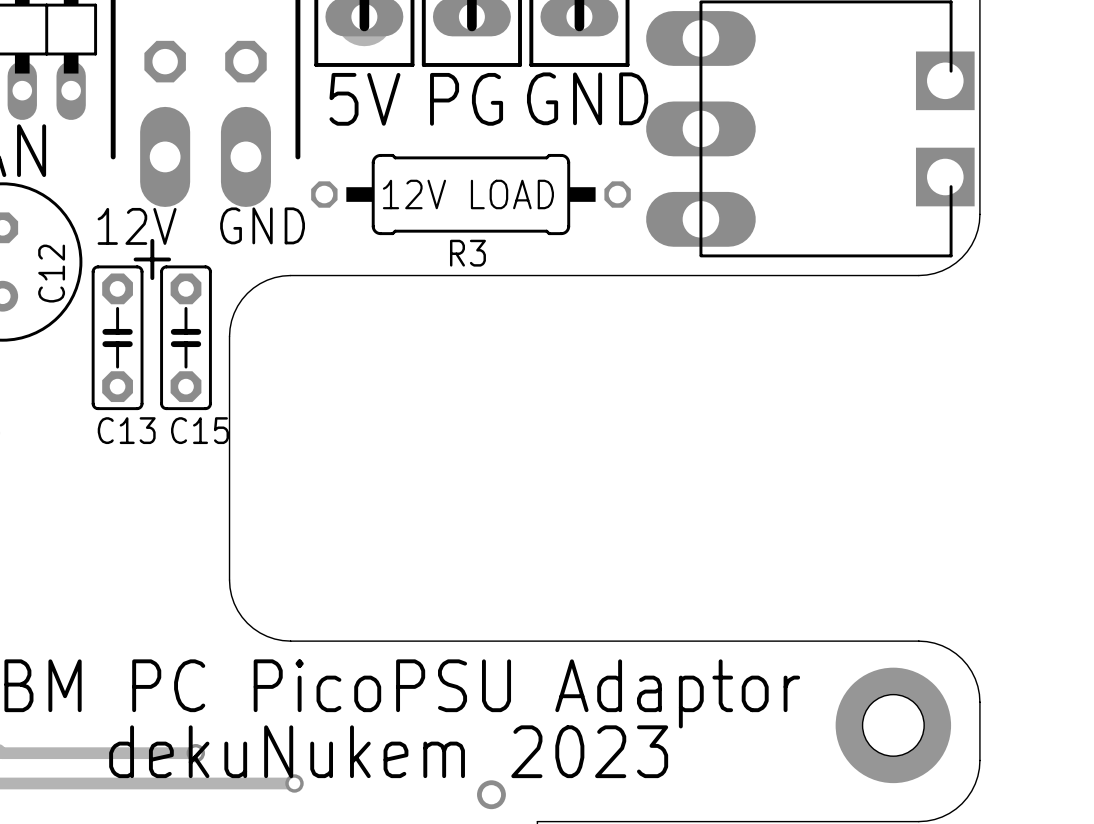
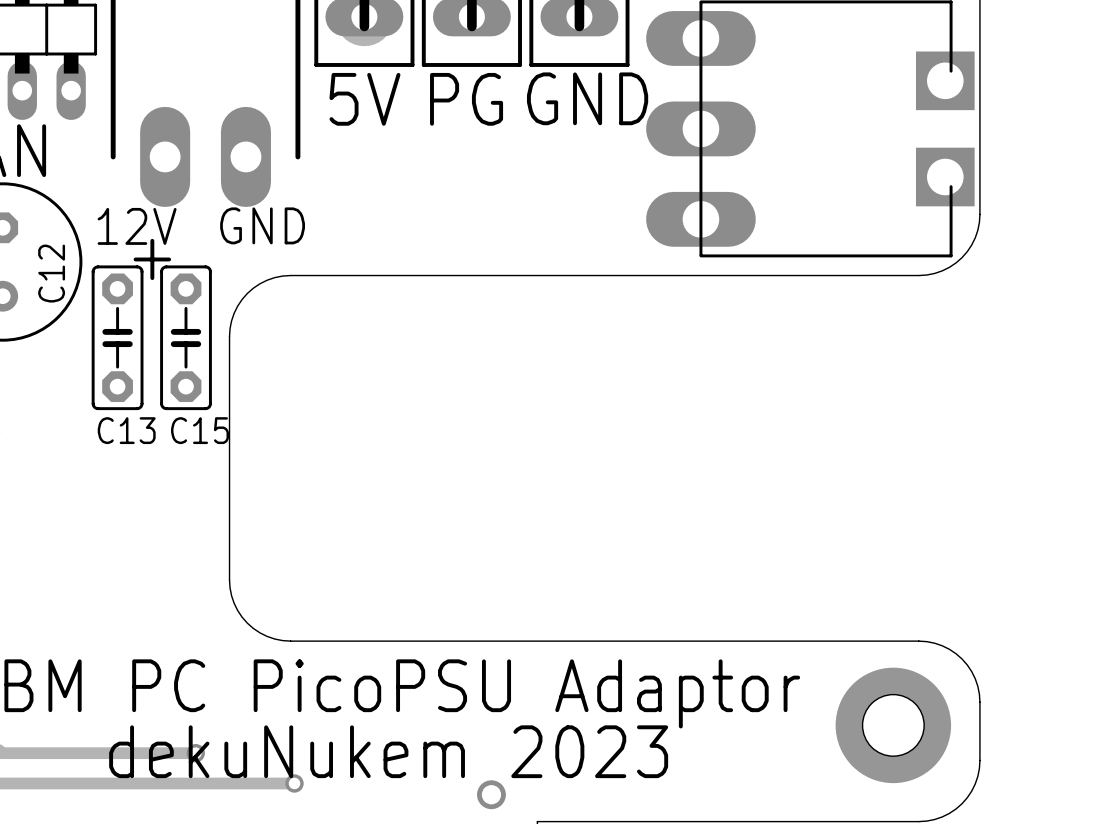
part: (165, 61) -> none
part: (245, 61) -> none
text: 12V LOAD (468, 194) -> none
R3: (470, 194) -> none

